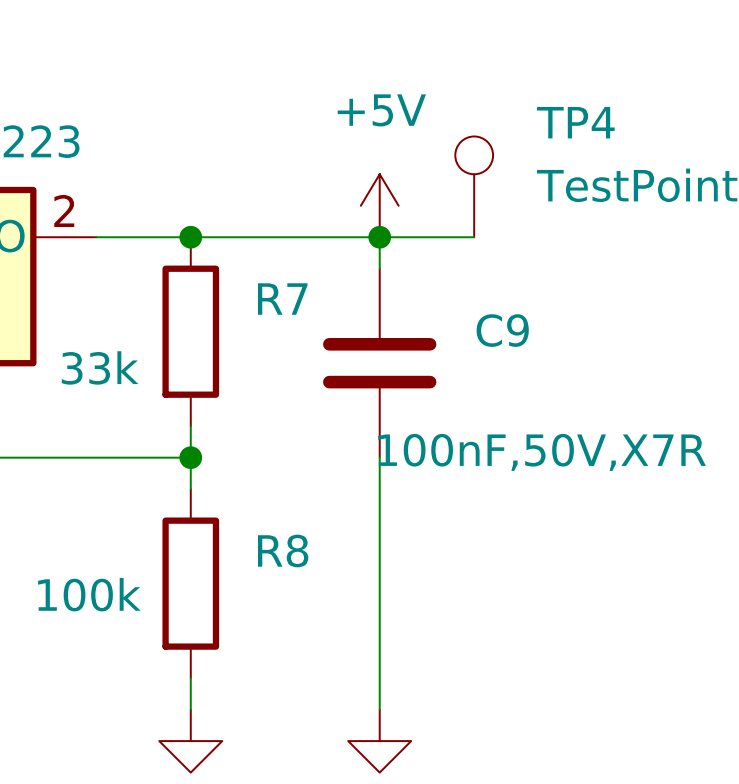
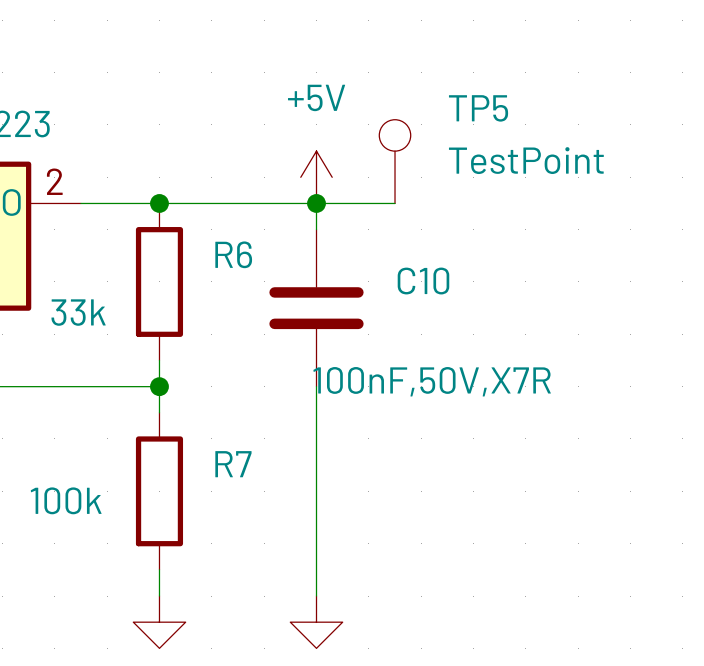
TP4 name: TP4 (575, 122) -> TP5 (478, 108)
R7 name: R7 (282, 299) -> R6 (233, 254)
C9 name: C9 (502, 330) -> C10 (423, 281)
R8 name: R8 (283, 550) -> R7 (233, 464)

